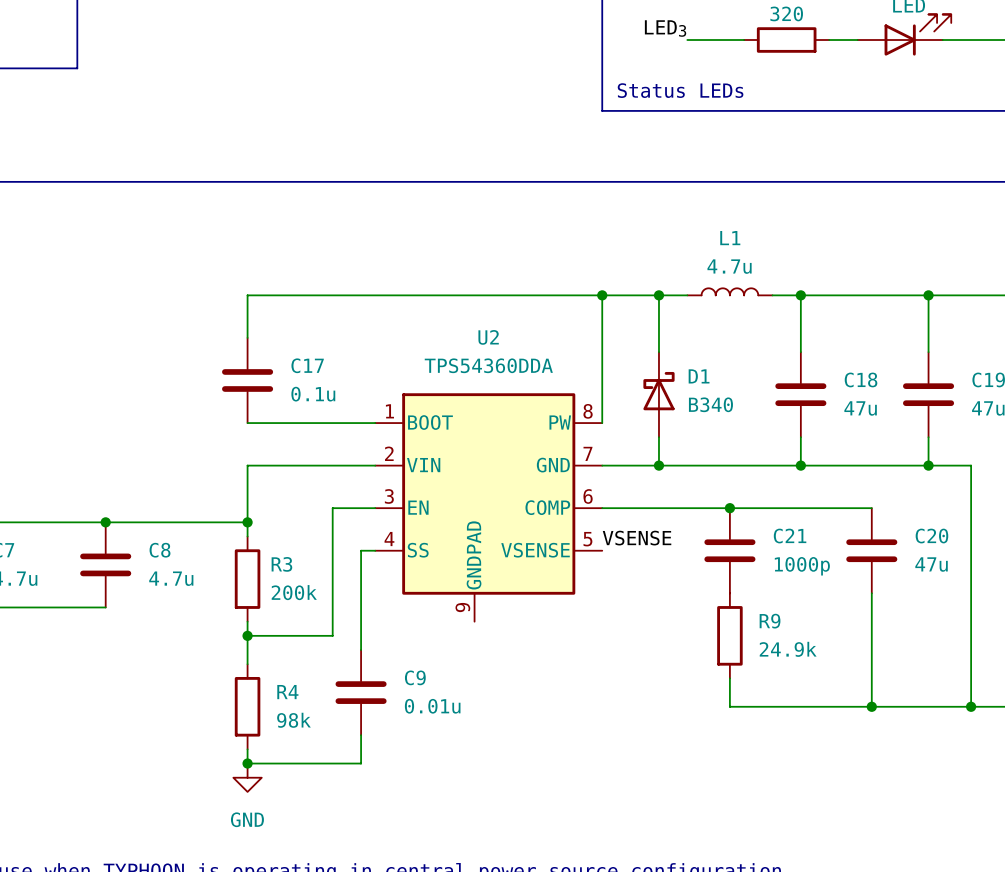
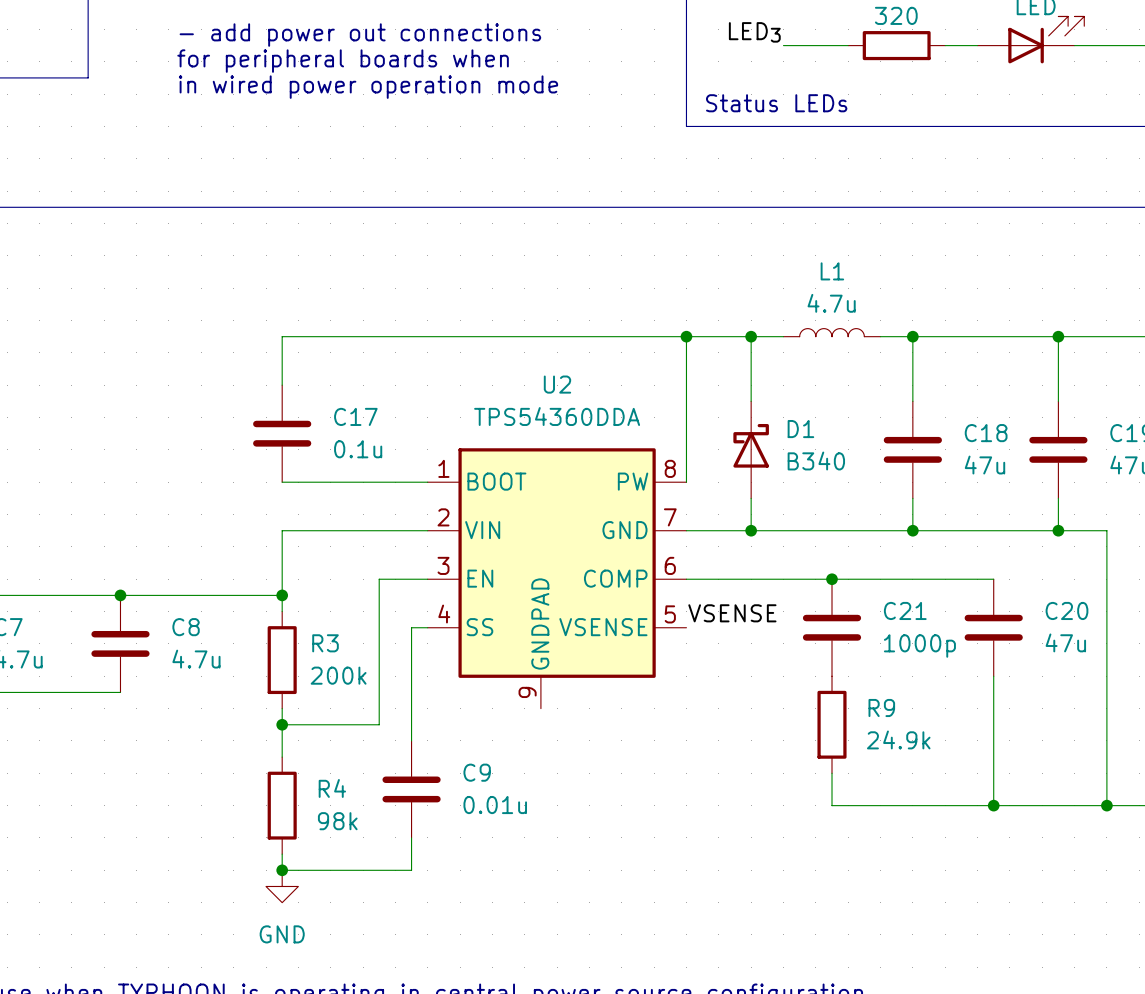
text: none -> - add power out connections (360, 35)
text: none -> for peripheral boards when (343, 61)
text: none -> in wired power operation mode (368, 87)

